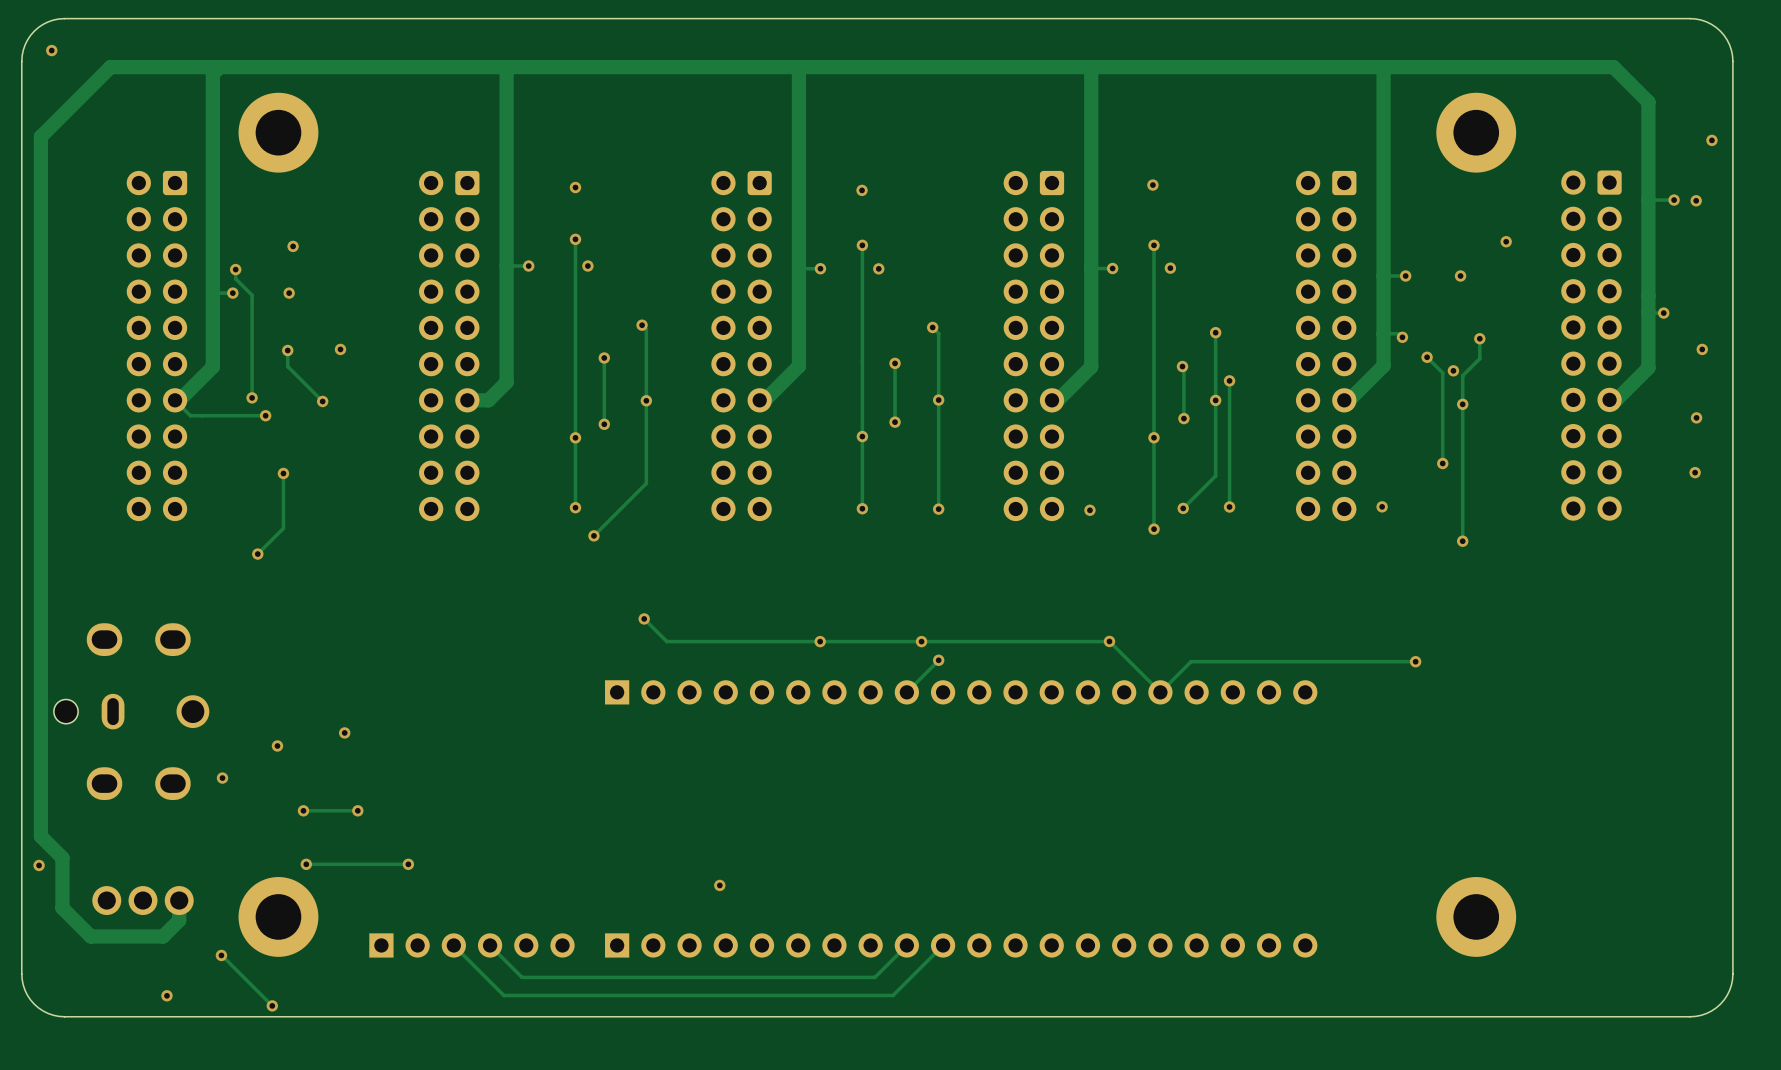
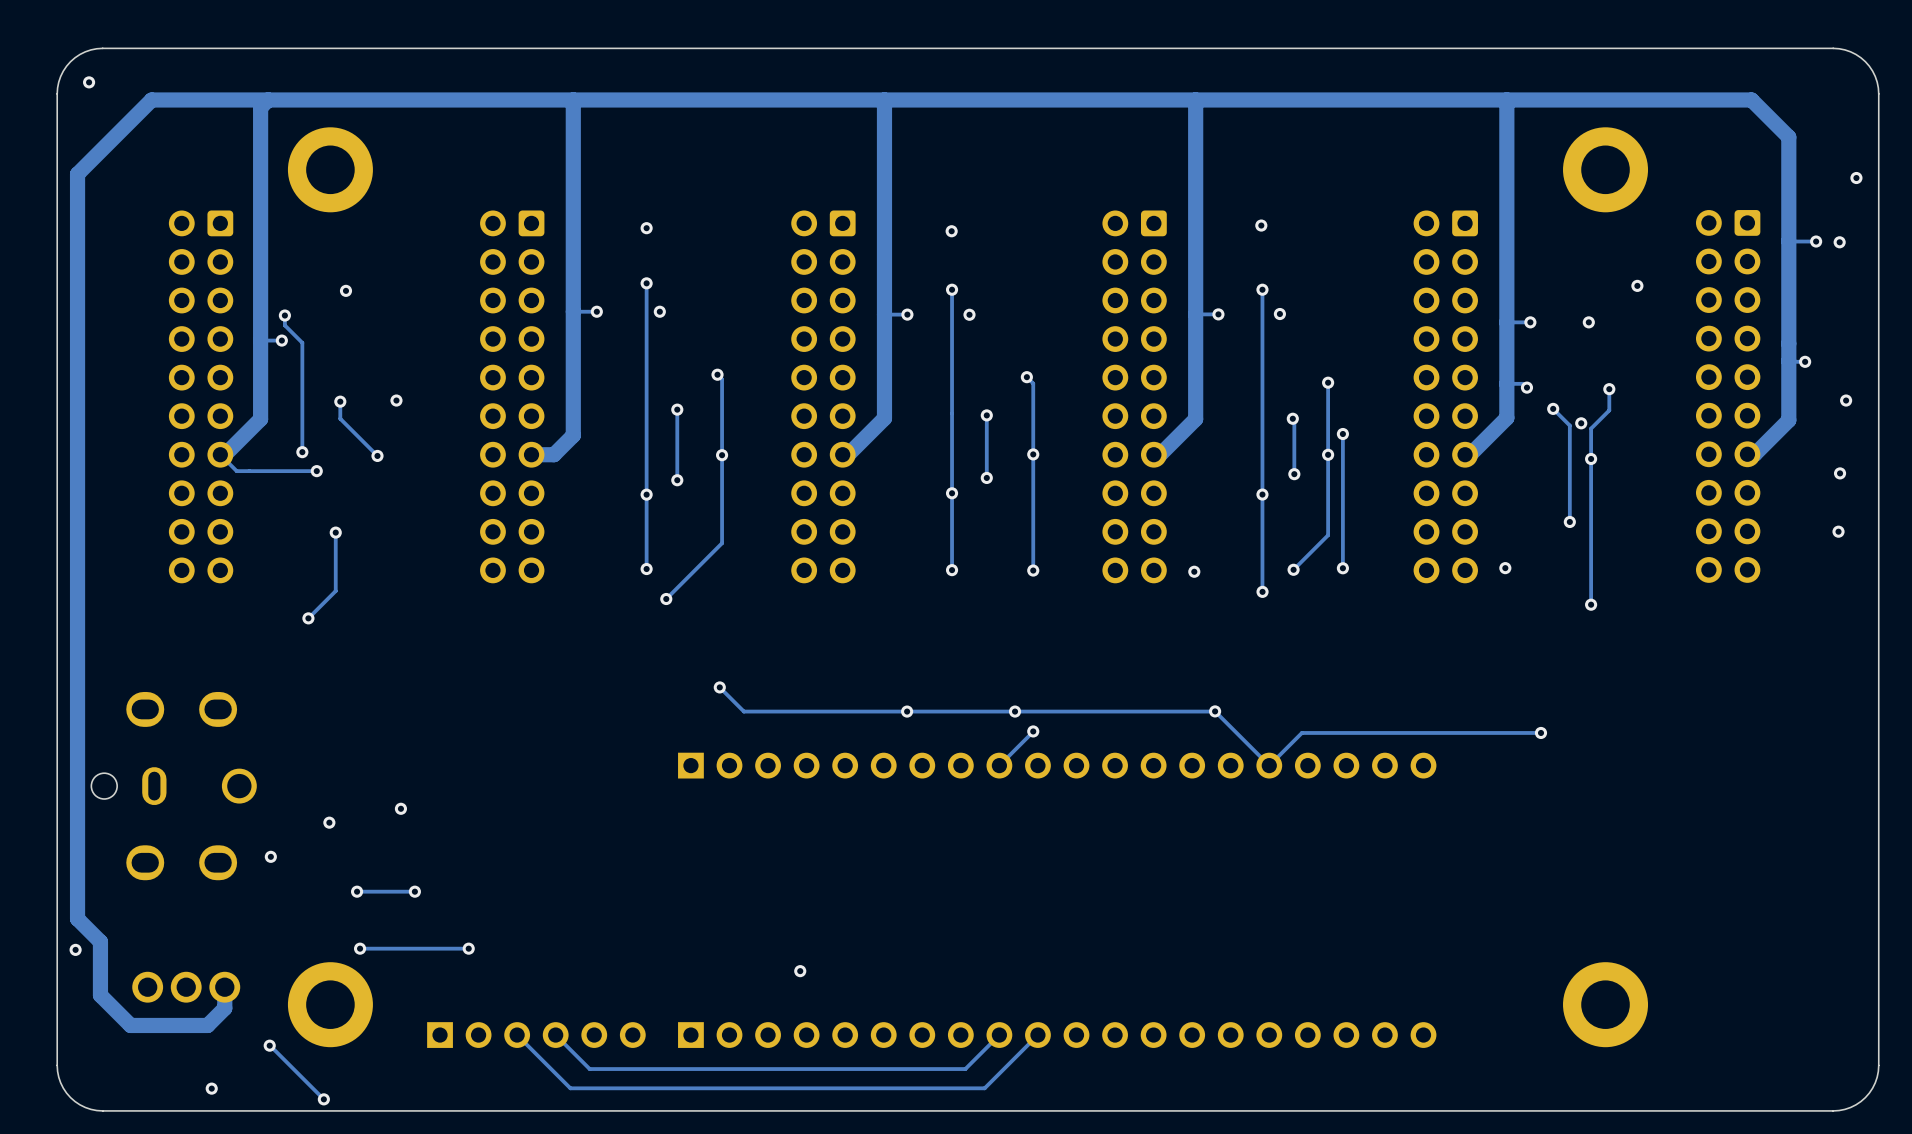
via: (289, 293) -> none

